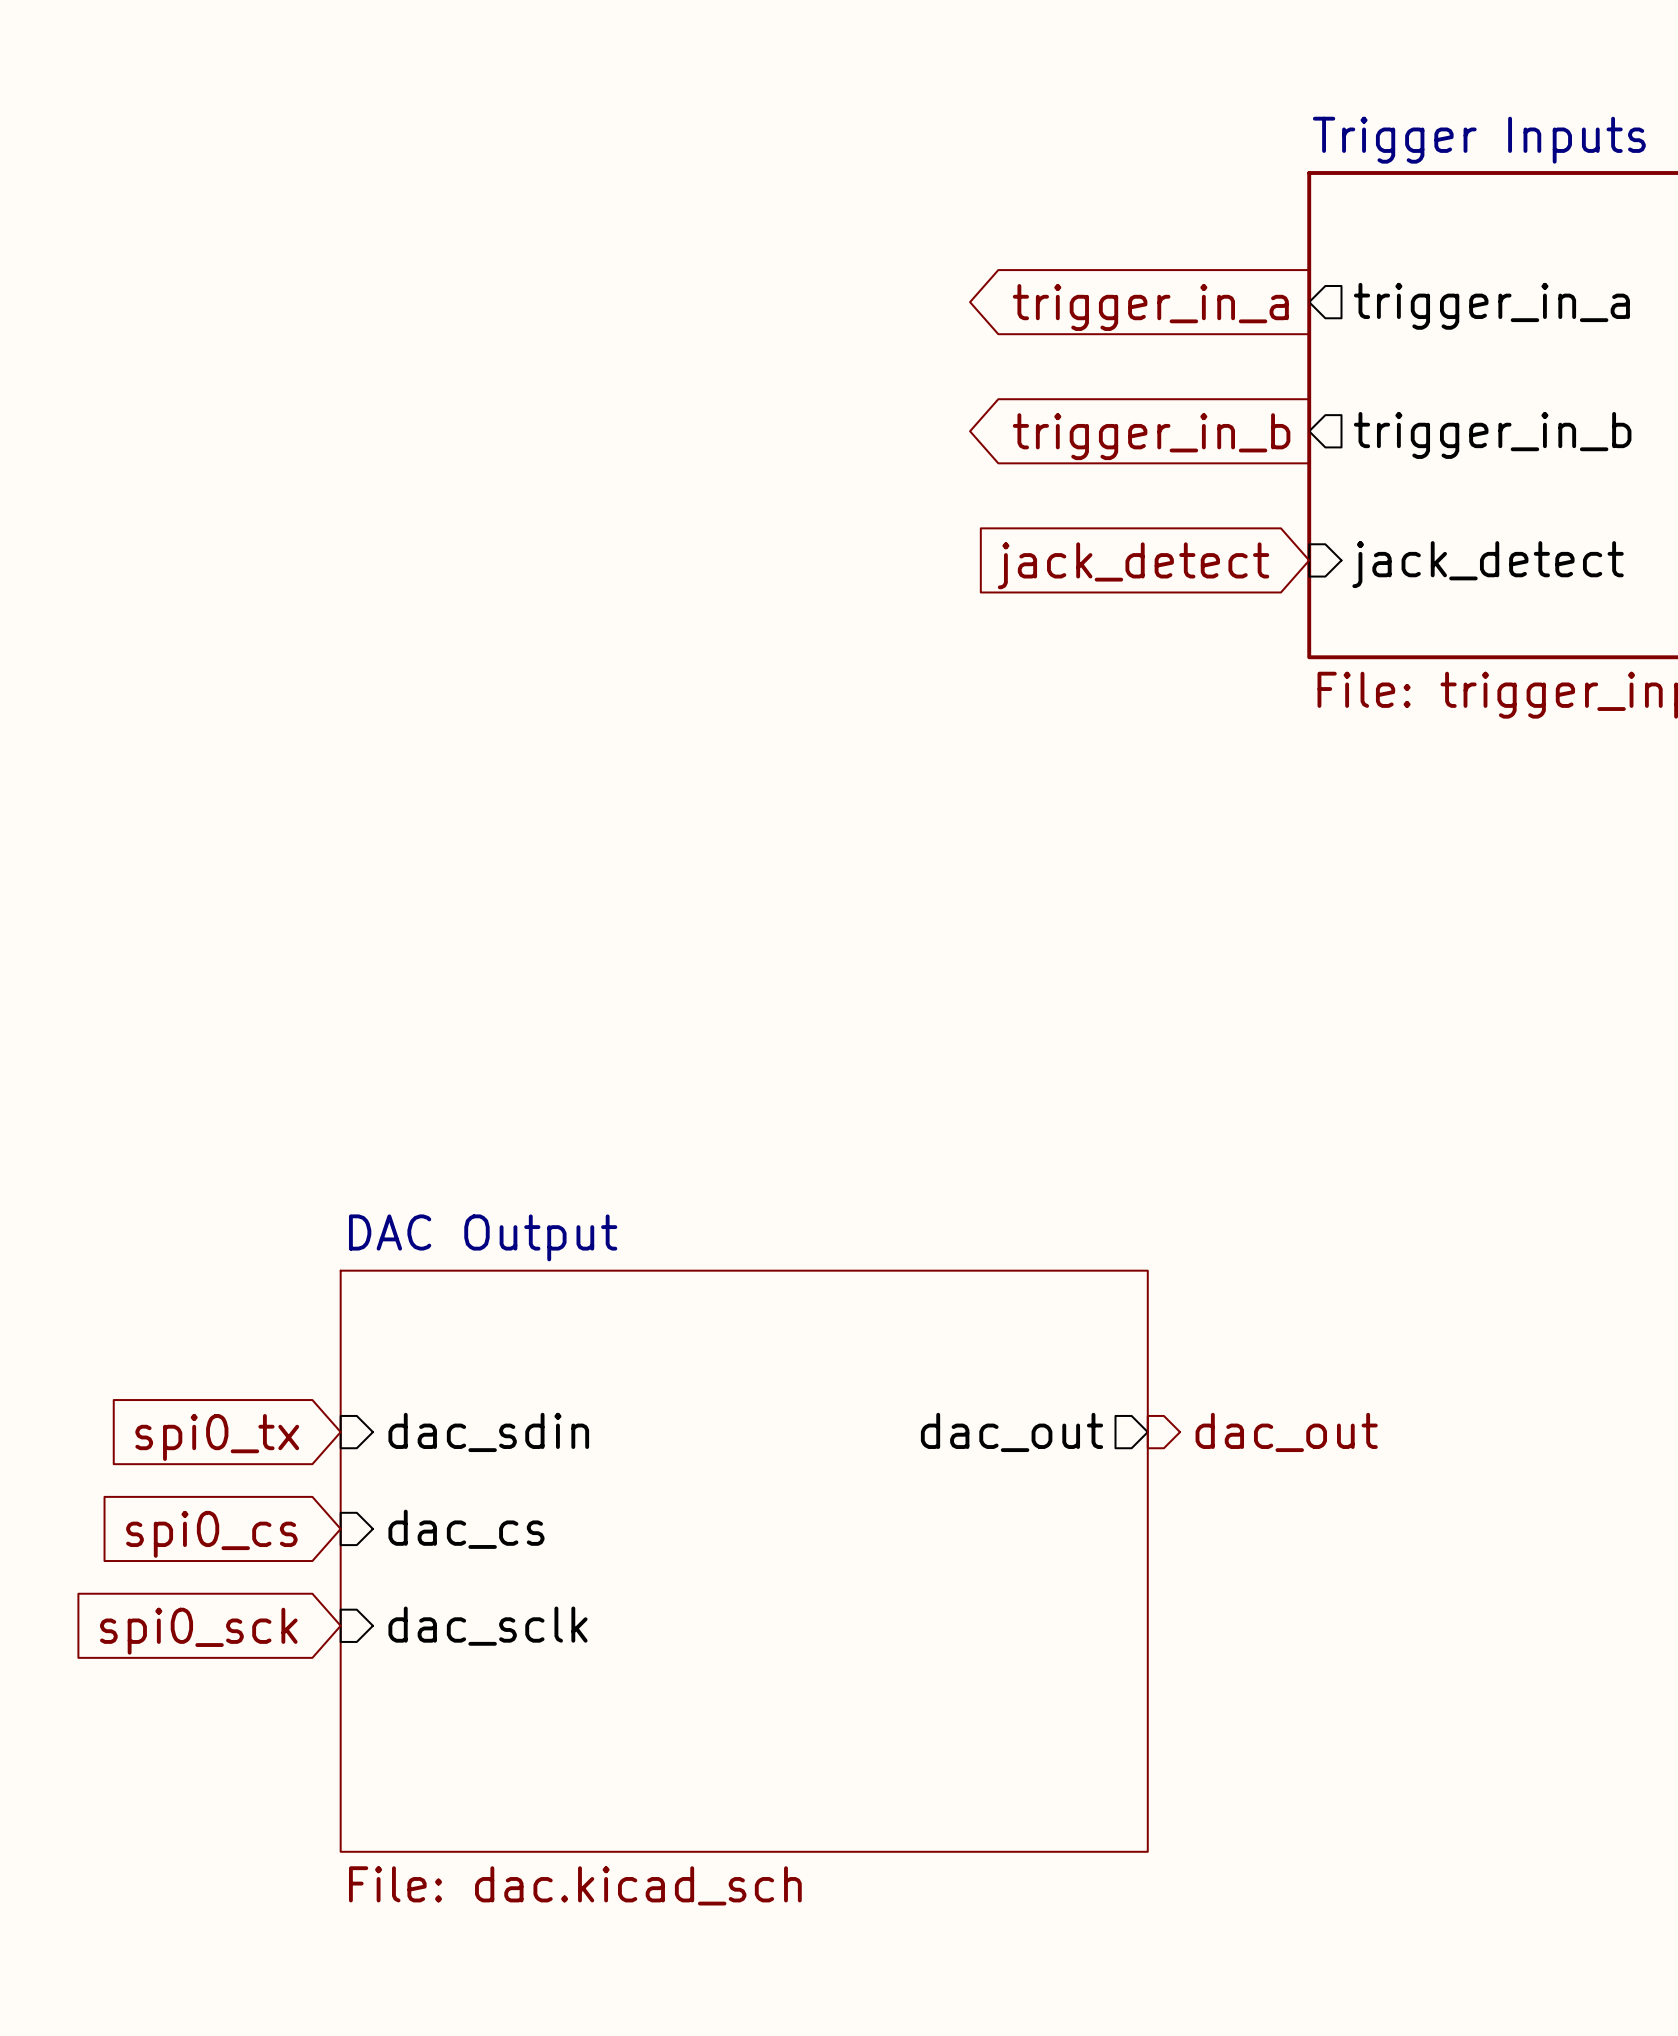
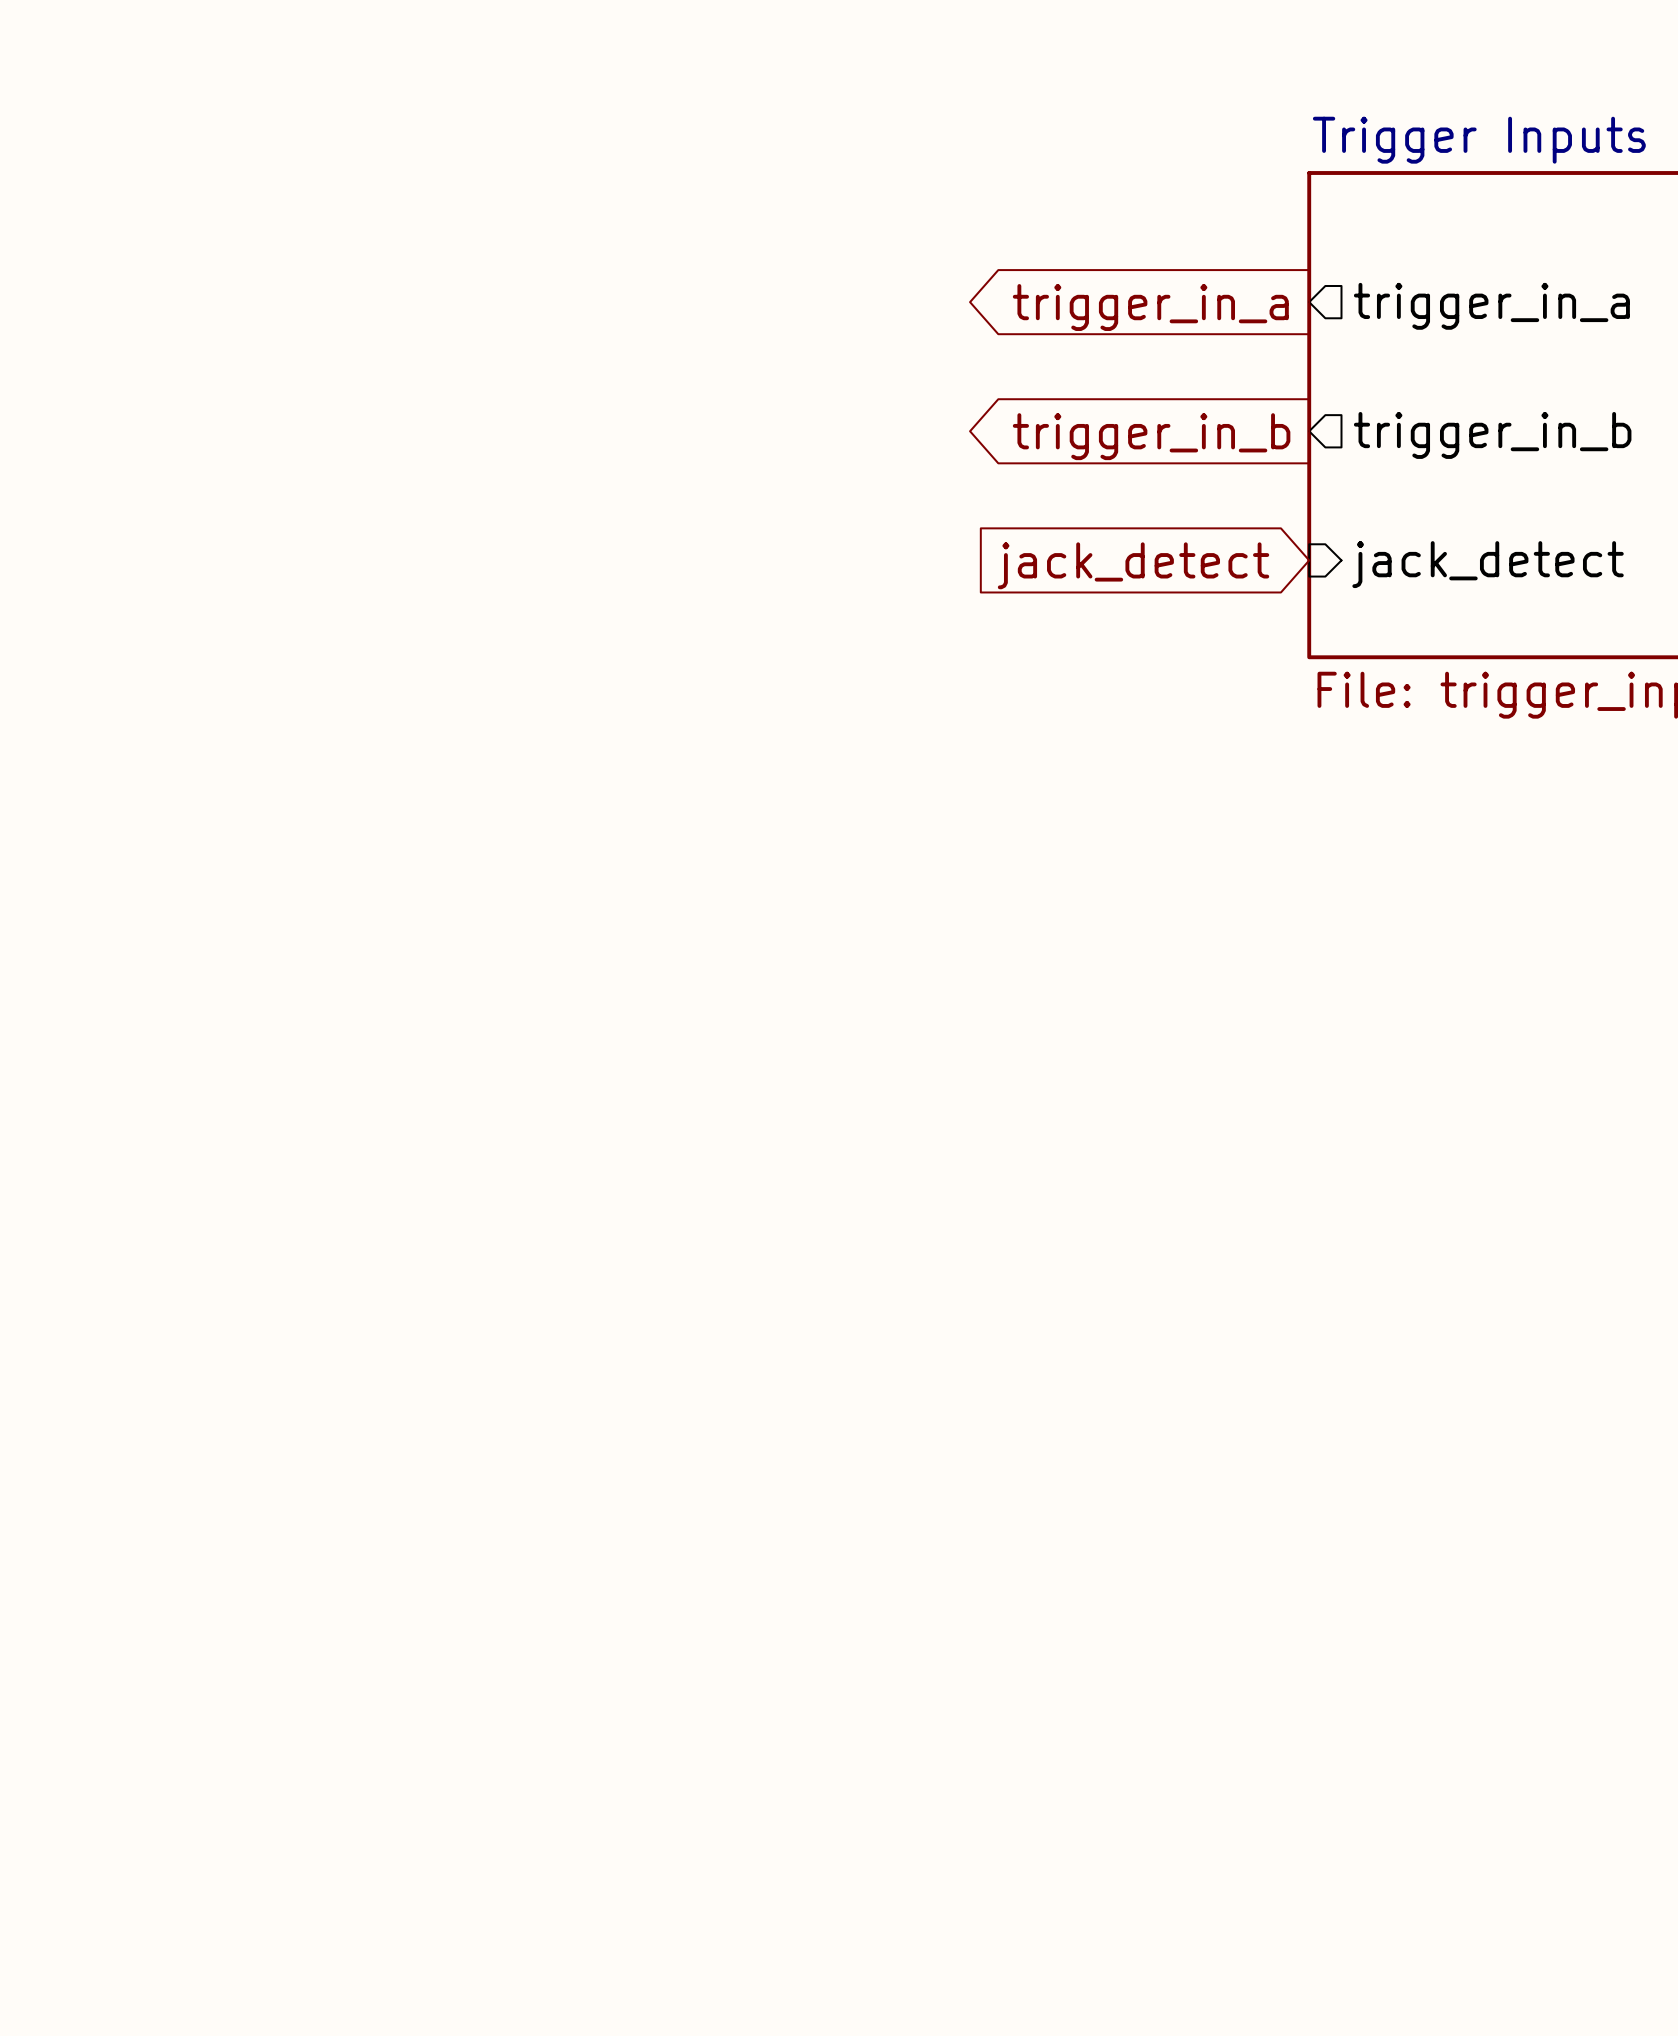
sheet pin: dac_sdin (488, 1432) -> none
sheet pin: dac_out (1012, 1432) -> none
hierarchical label: dac_out (1286, 1432) -> none
global label: spi0_tx (217, 1437) -> none
sheet pin: dac_cs (466, 1529) -> none
global label: spi0_cs (211, 1534) -> none
sheet DAC Output: File: dac.kicad_sch (744, 1561) -> none
sheet pin: dac_sclk (487, 1626) -> none
global label: spi0_sck (198, 1631) -> none

